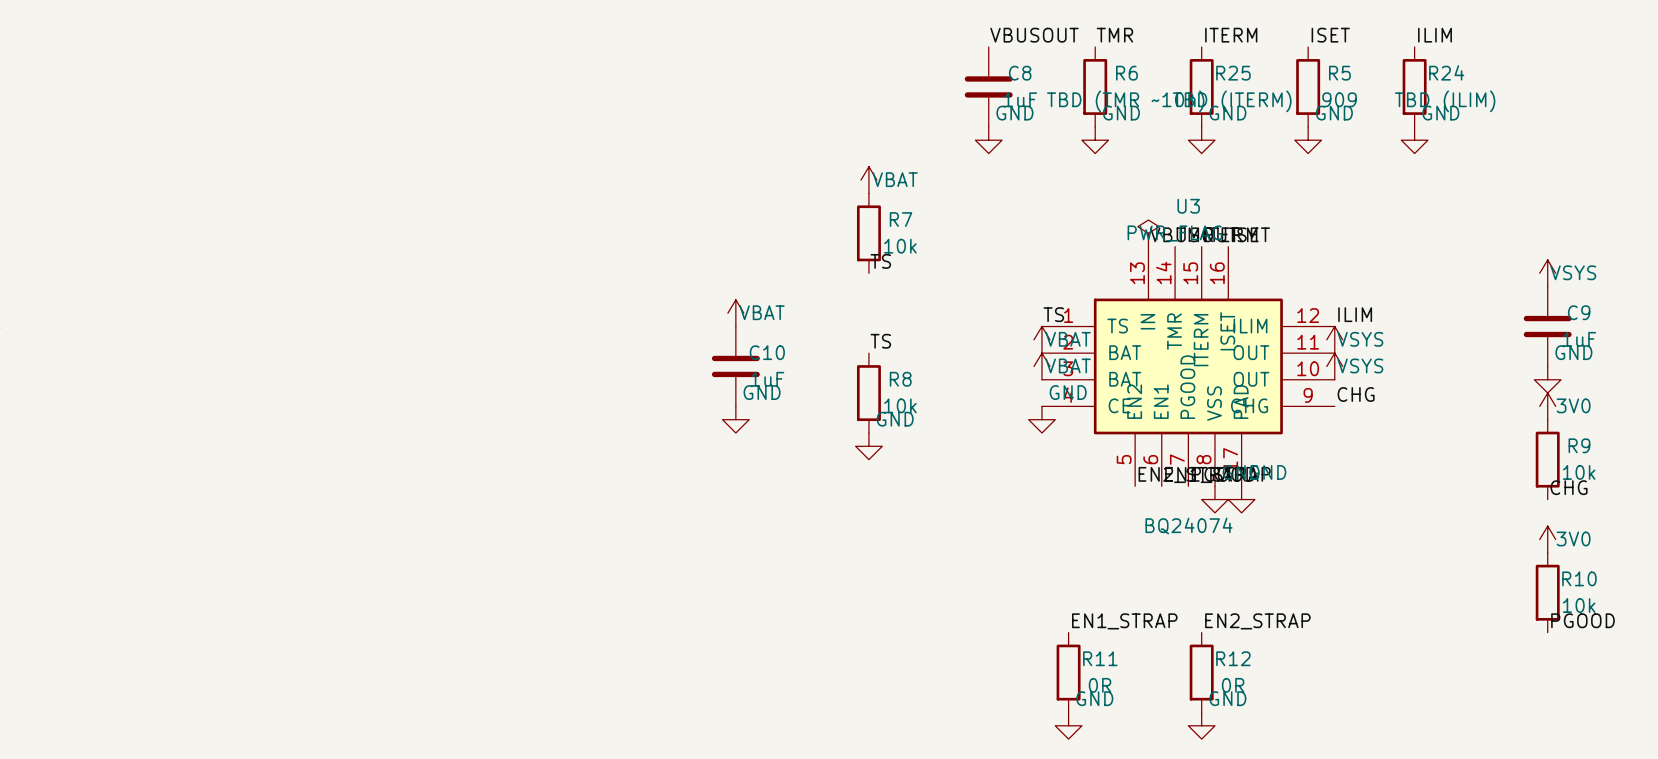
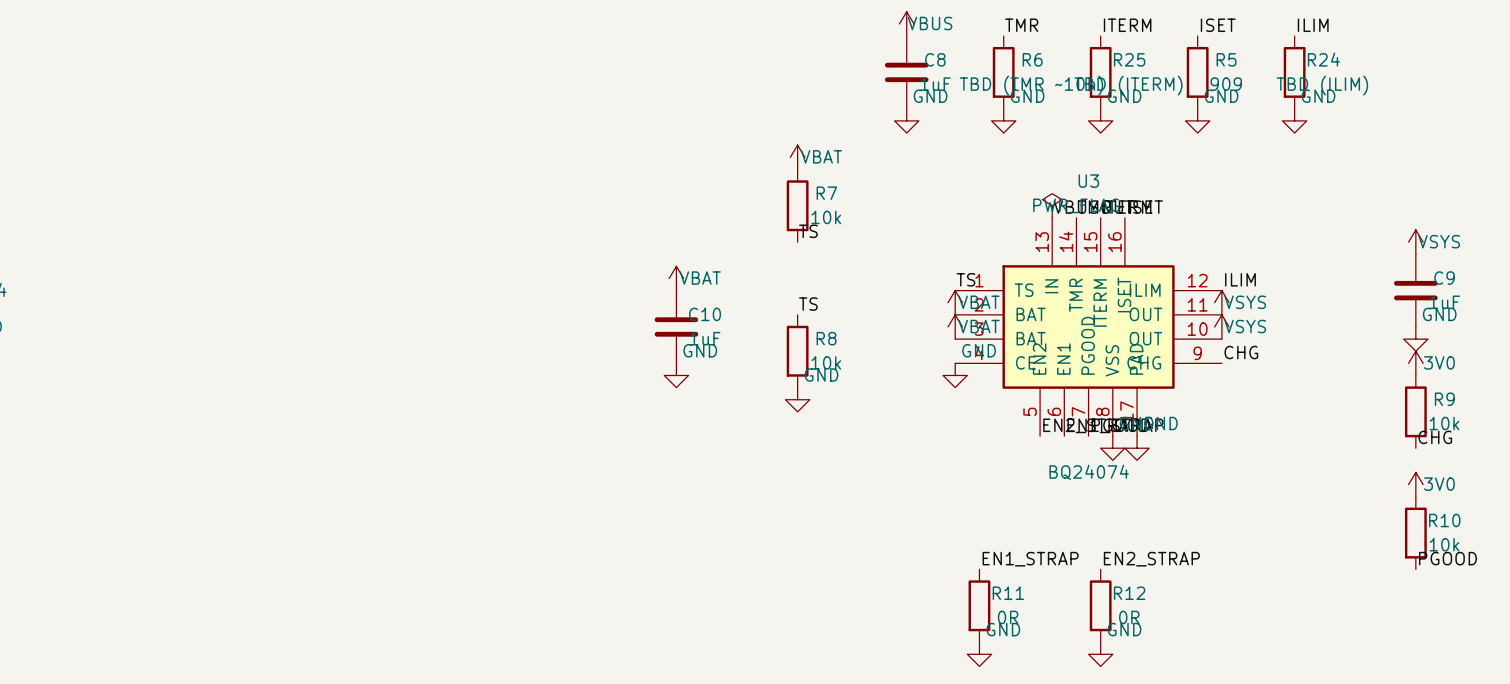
power symbol: none -> VBUS (906, 23)
label: VBUSOUT (1034, 35) -> none

